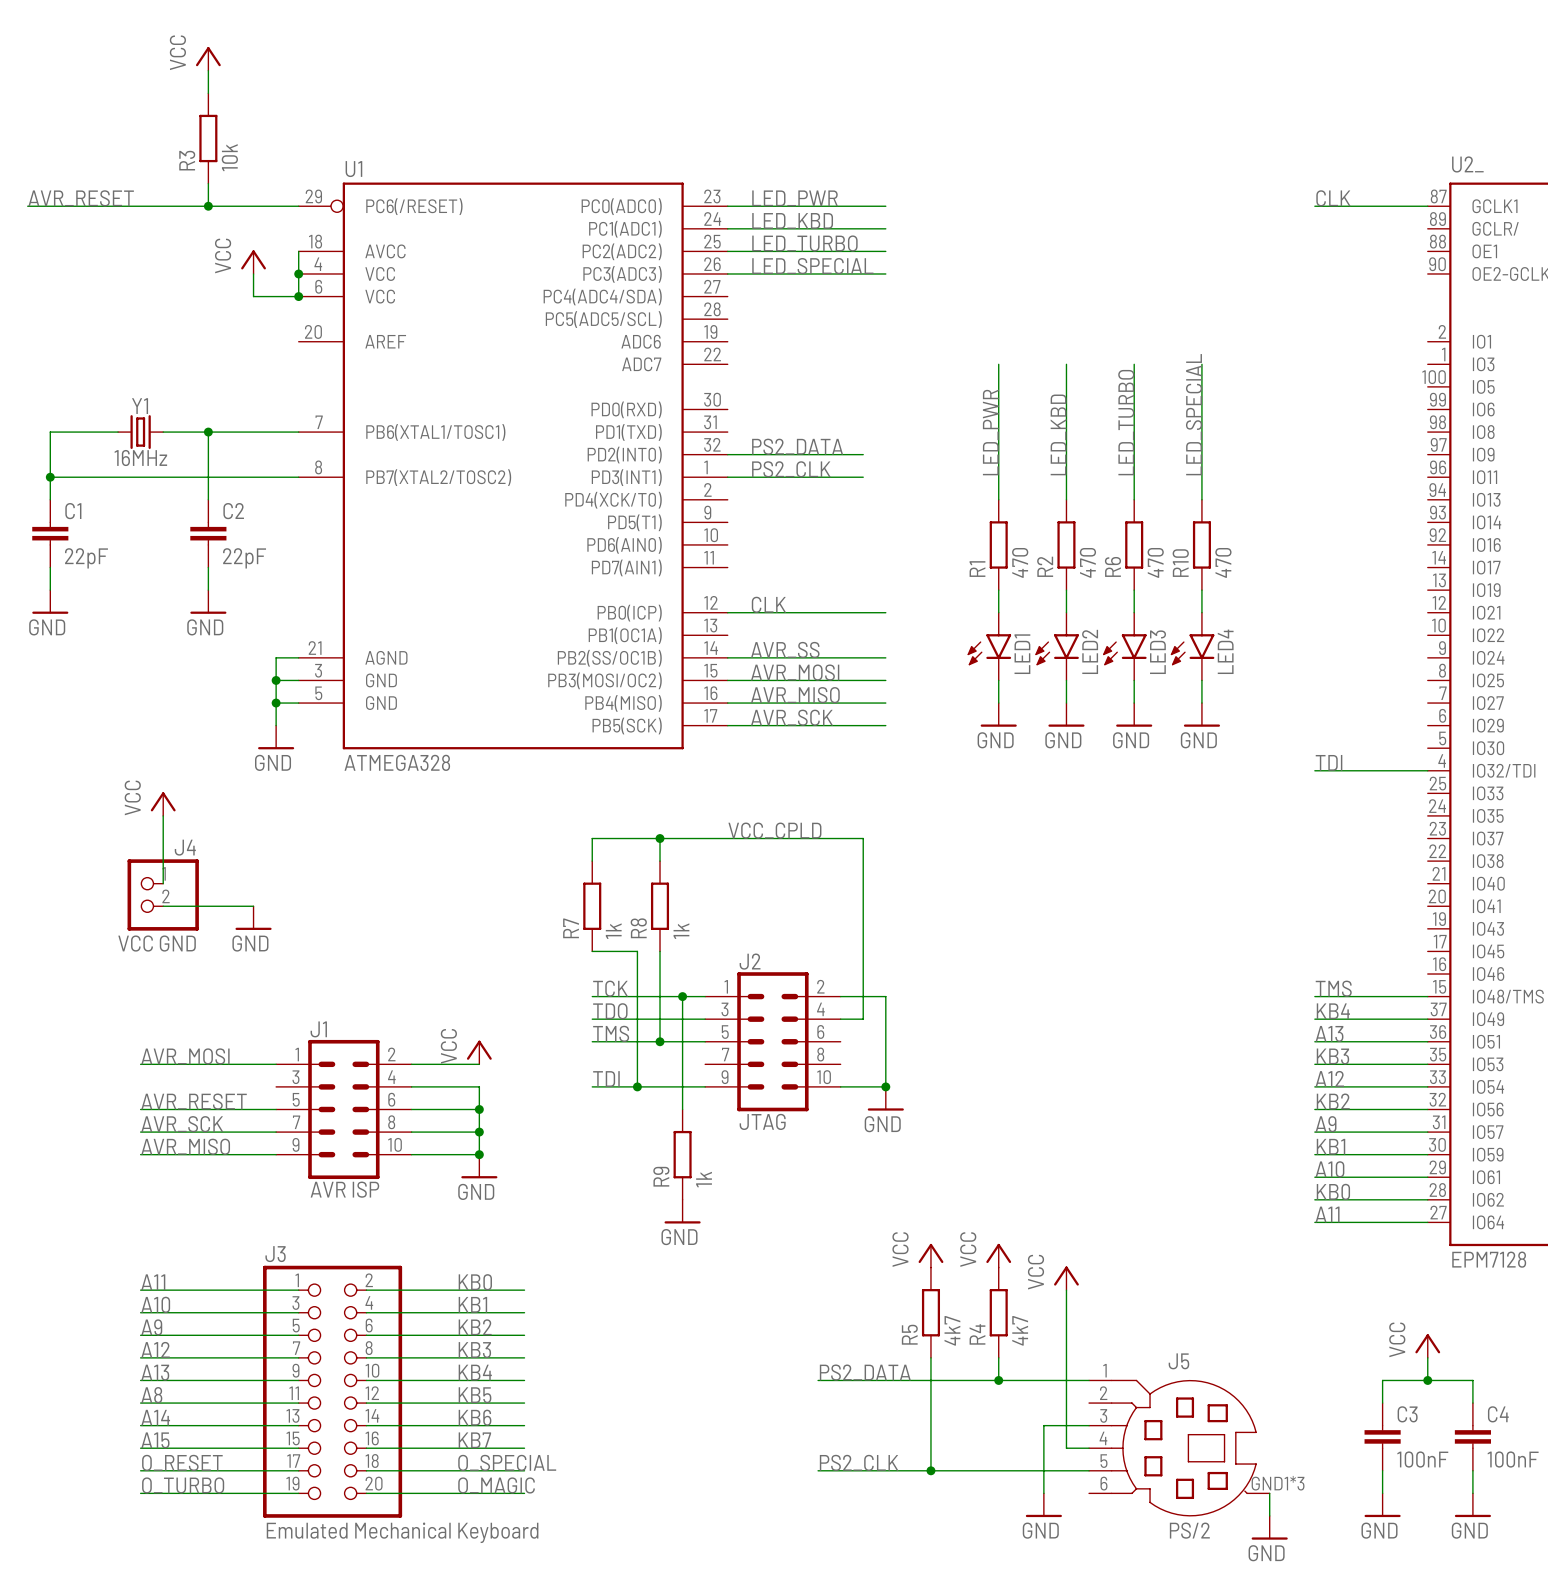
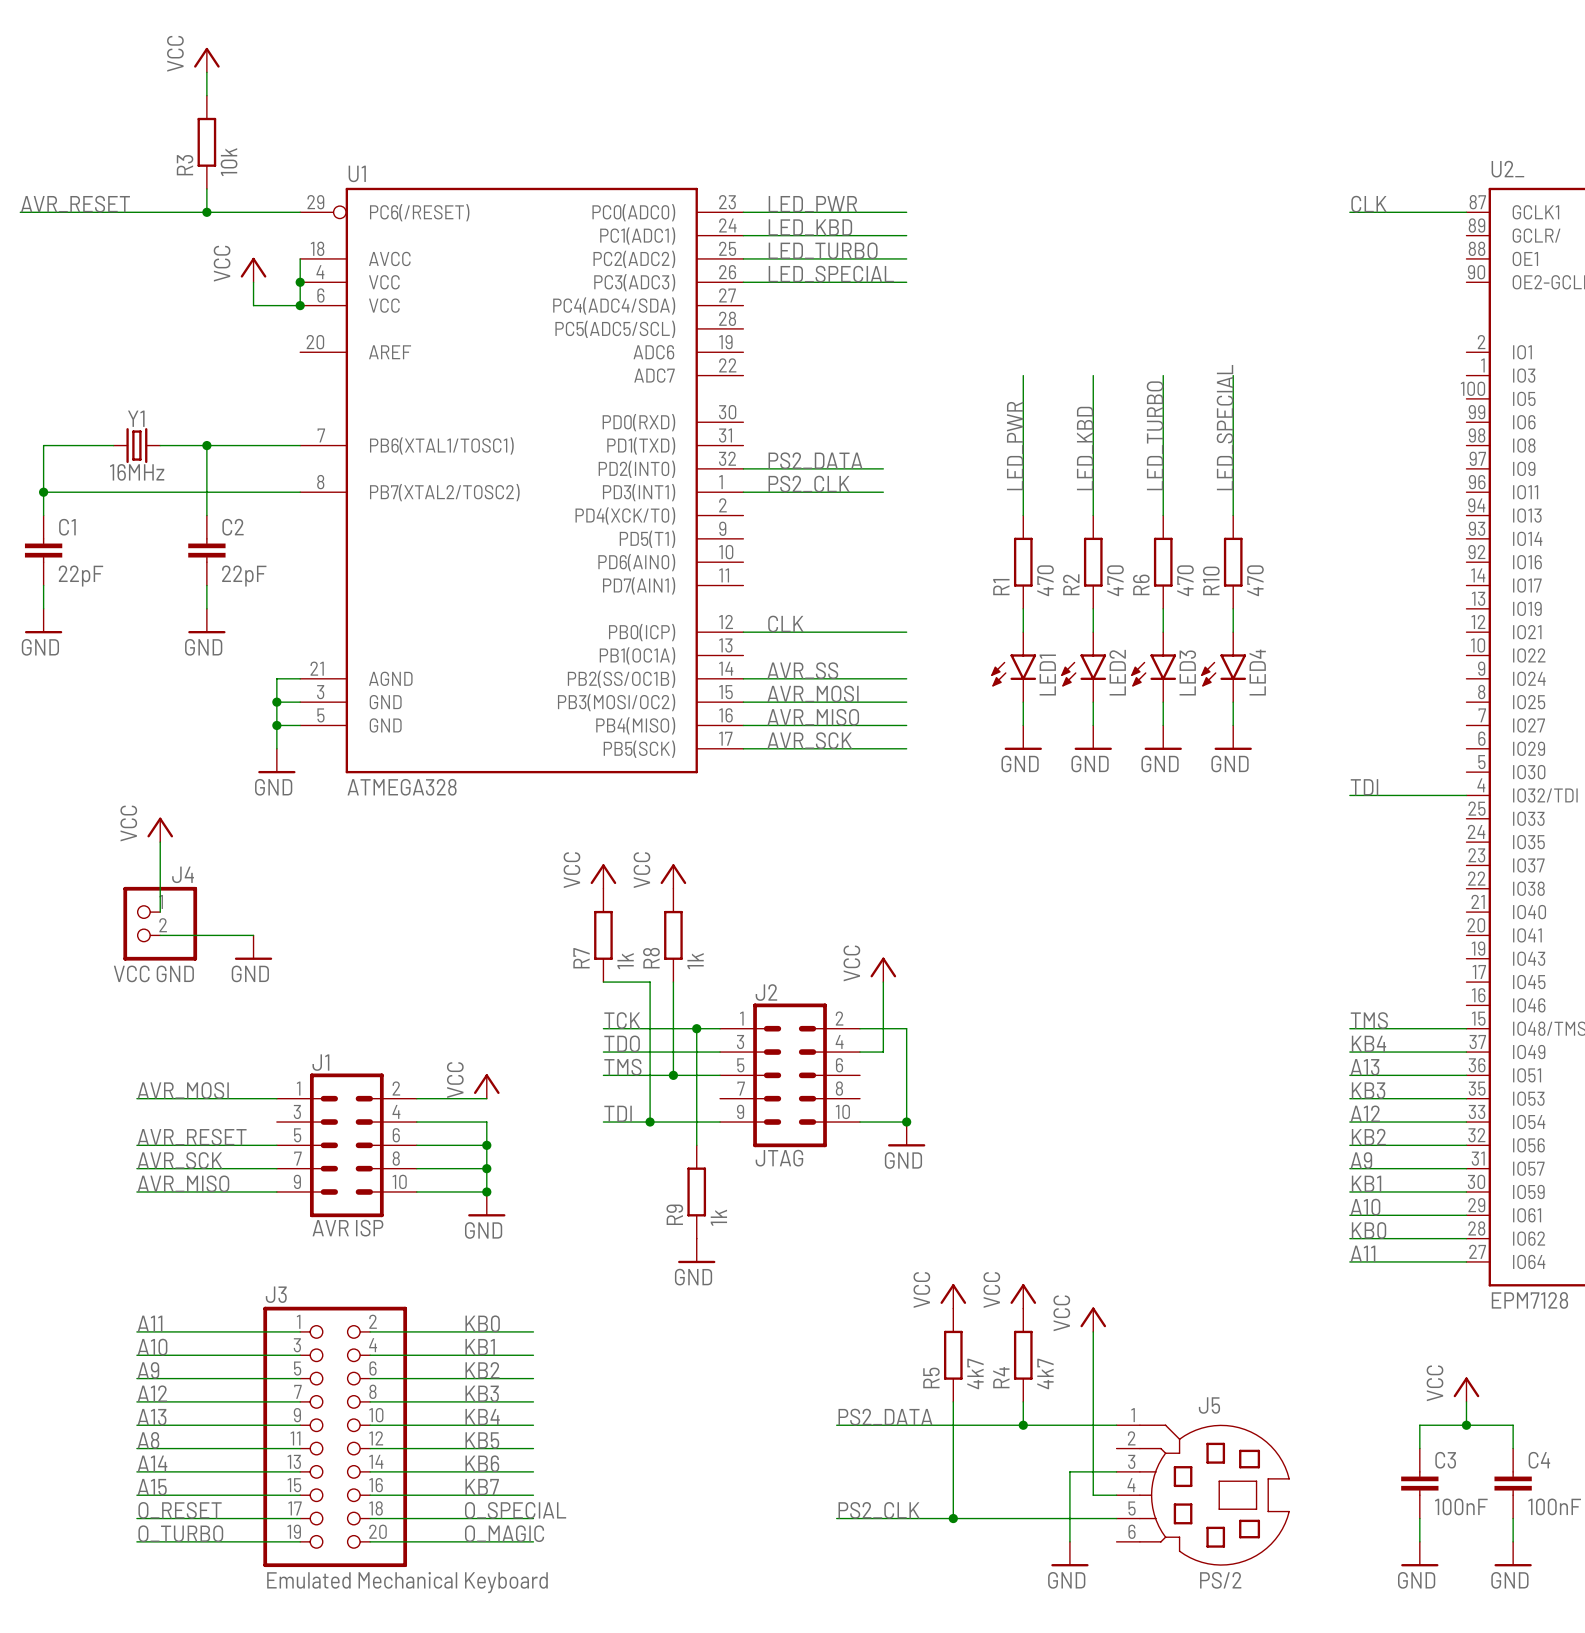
label: VCC_CPLD (774, 830) -> none
junction: (660, 838) -> none
power symbol: none -> VCC (603, 876)
power symbol: none -> VCC (673, 876)
wire: (592, 861) (592, 838) (863, 838) (863, 951) -> none
power symbol: none -> VCC (883, 969)
J5 symbol: [1089, 1379, 1270, 1517] -> [1116, 1424, 1290, 1566]
wire: (1269, 1493) (1269, 1515) -> none
power symbol: GND (1269, 1527) -> none

